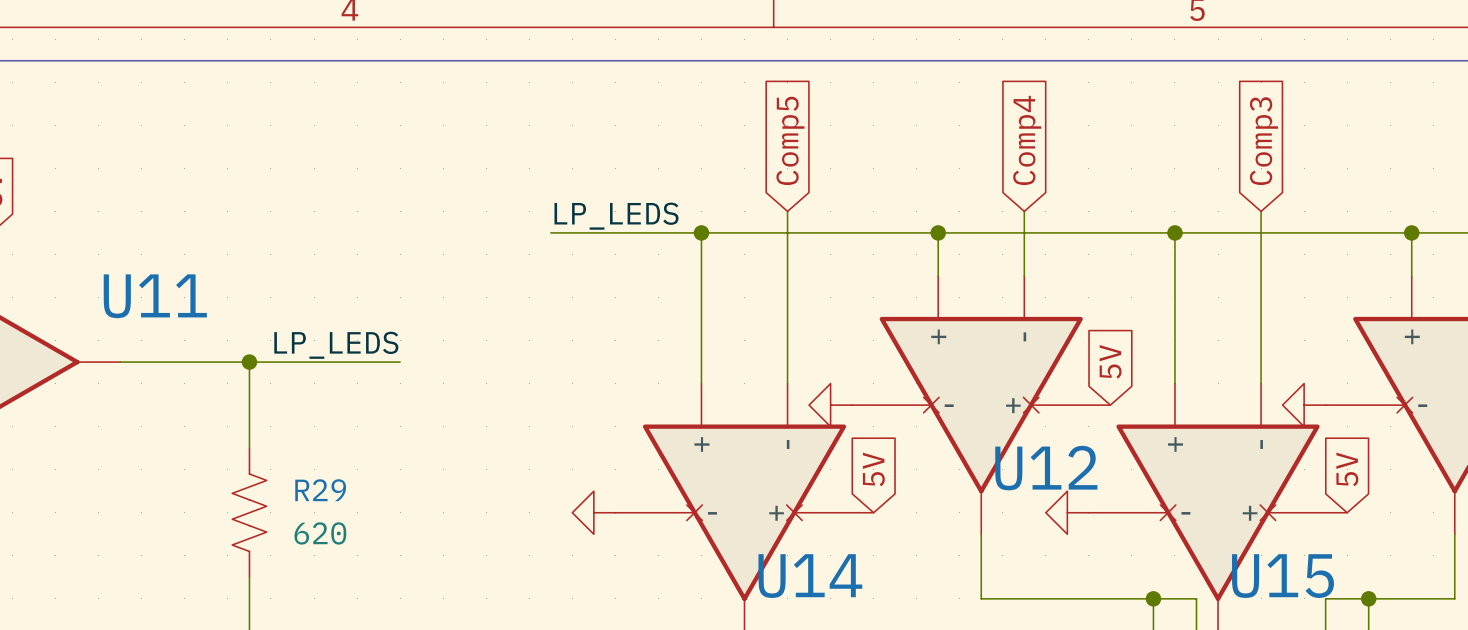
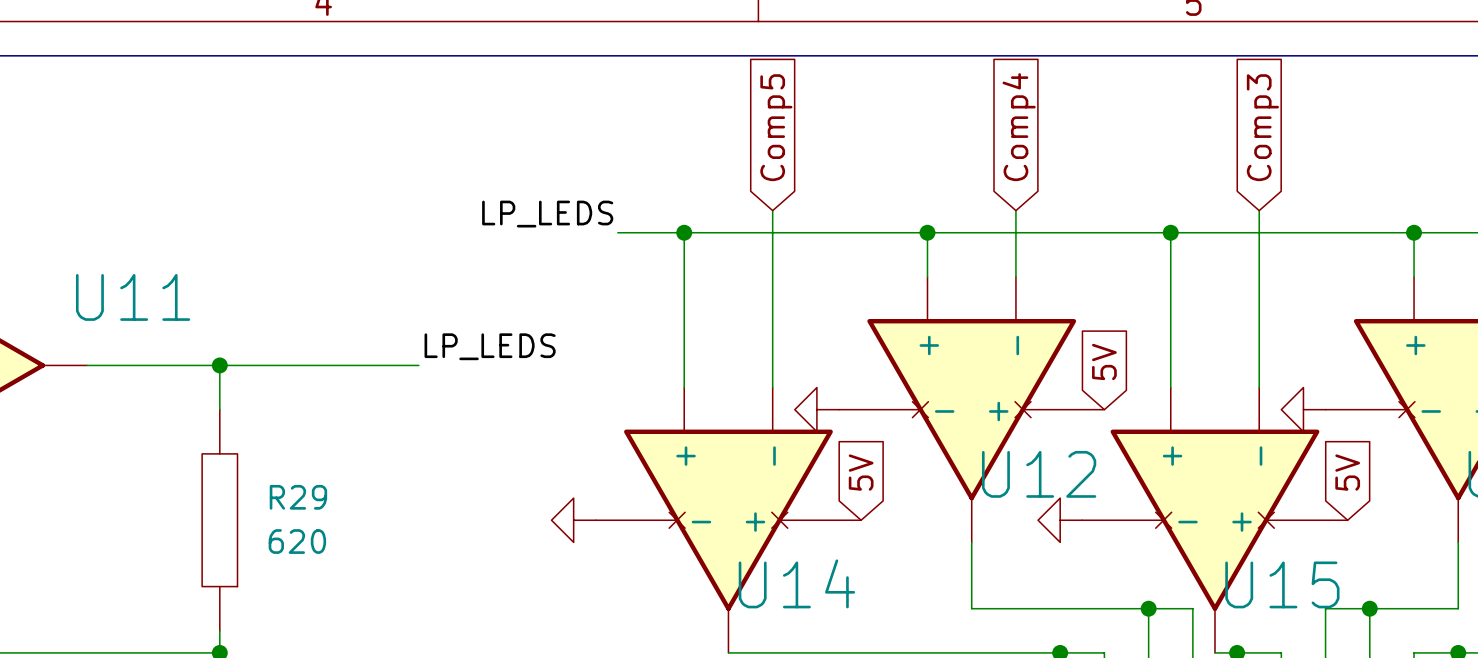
label position: LP_LEDS (616, 216) -> LP_LEDS (547, 214)
wire: (550, 232) (636, 232) -> none
label position: LP_LEDS (336, 345) -> LP_LEDS (490, 346)
wire: none -> (374, 365) (418, 365)
R29 symbol: [232, 448, 267, 578] -> [202, 409, 238, 631]

